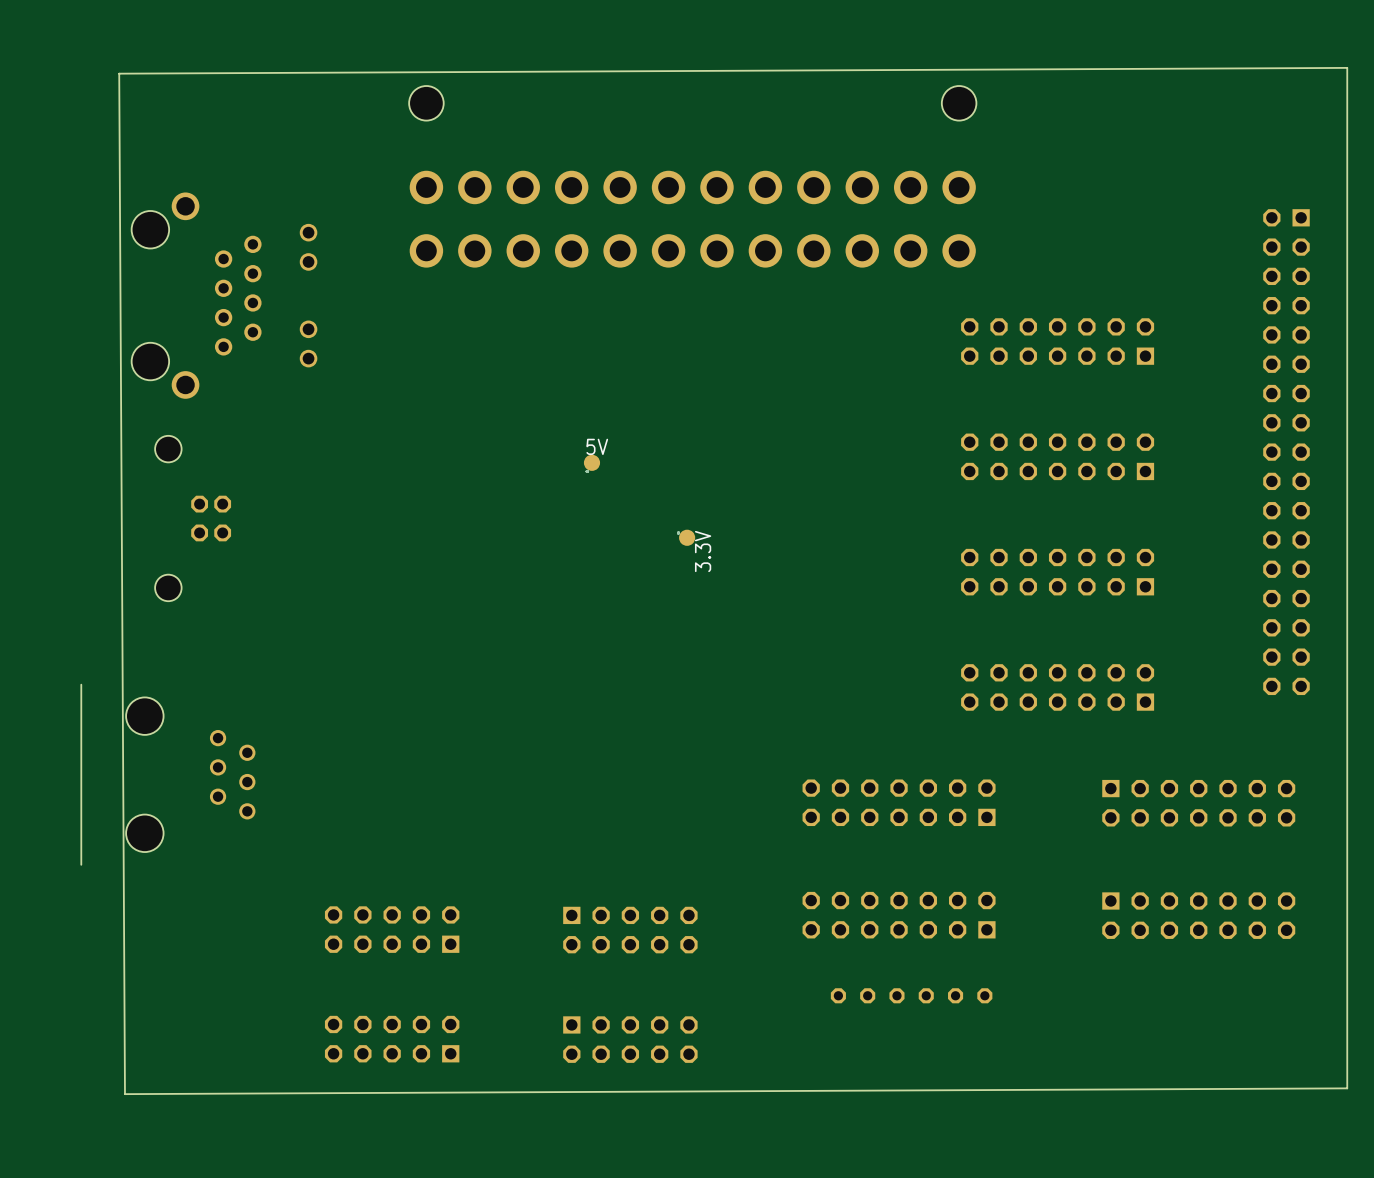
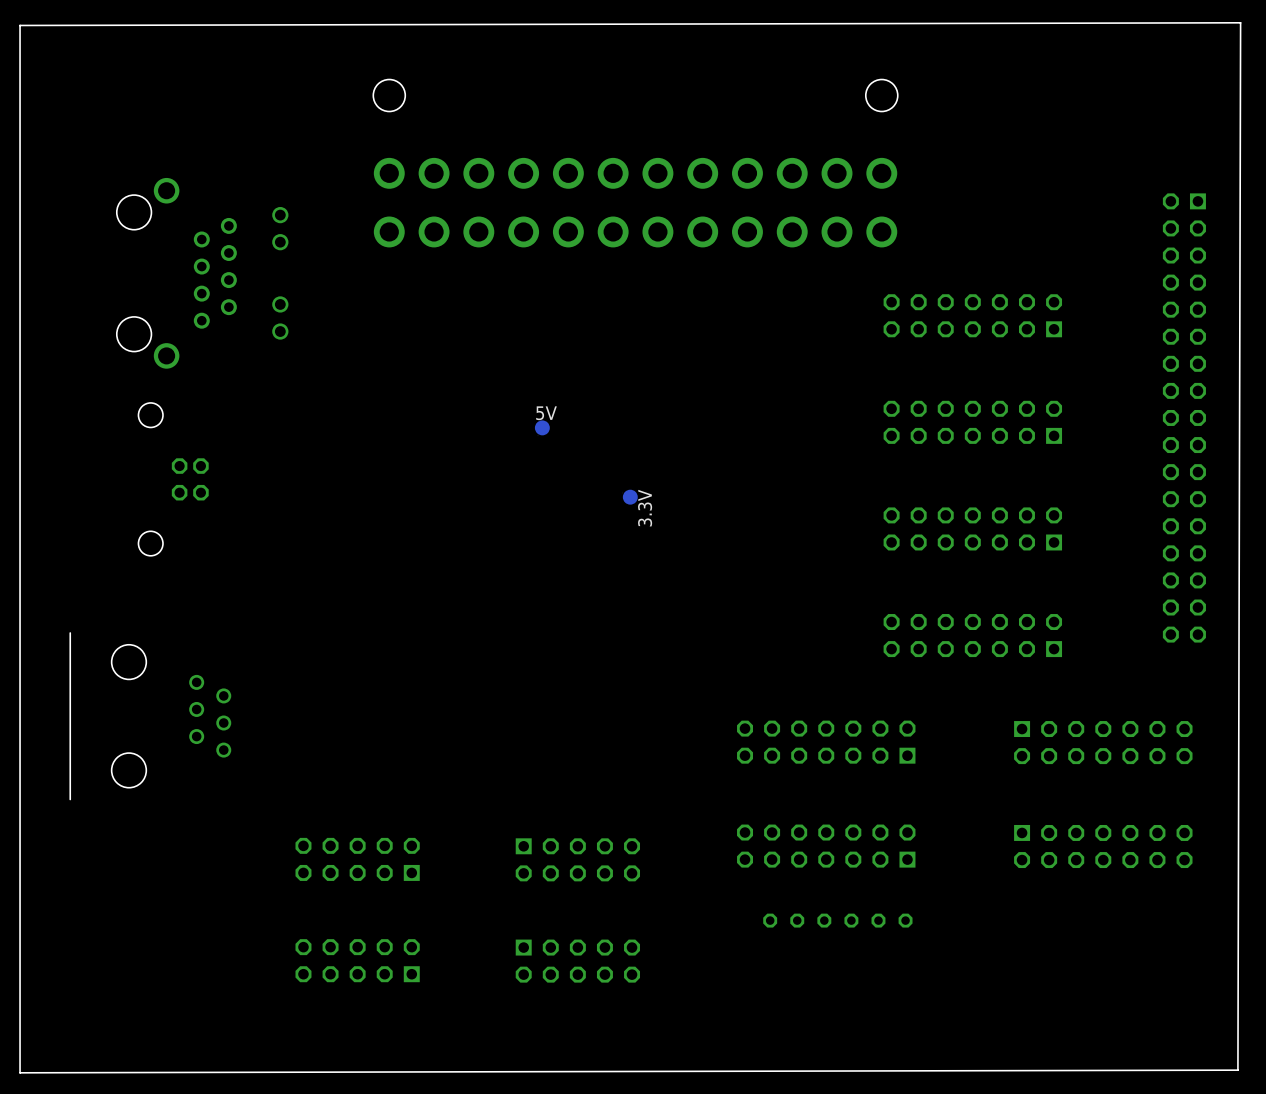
board edge: (1347, 67) (119, 73) (124, 1094) (1347, 1088) (1347, 67) -> (1240, 22) (1237, 1070) (20, 1072) (20, 25) (1240, 22)

